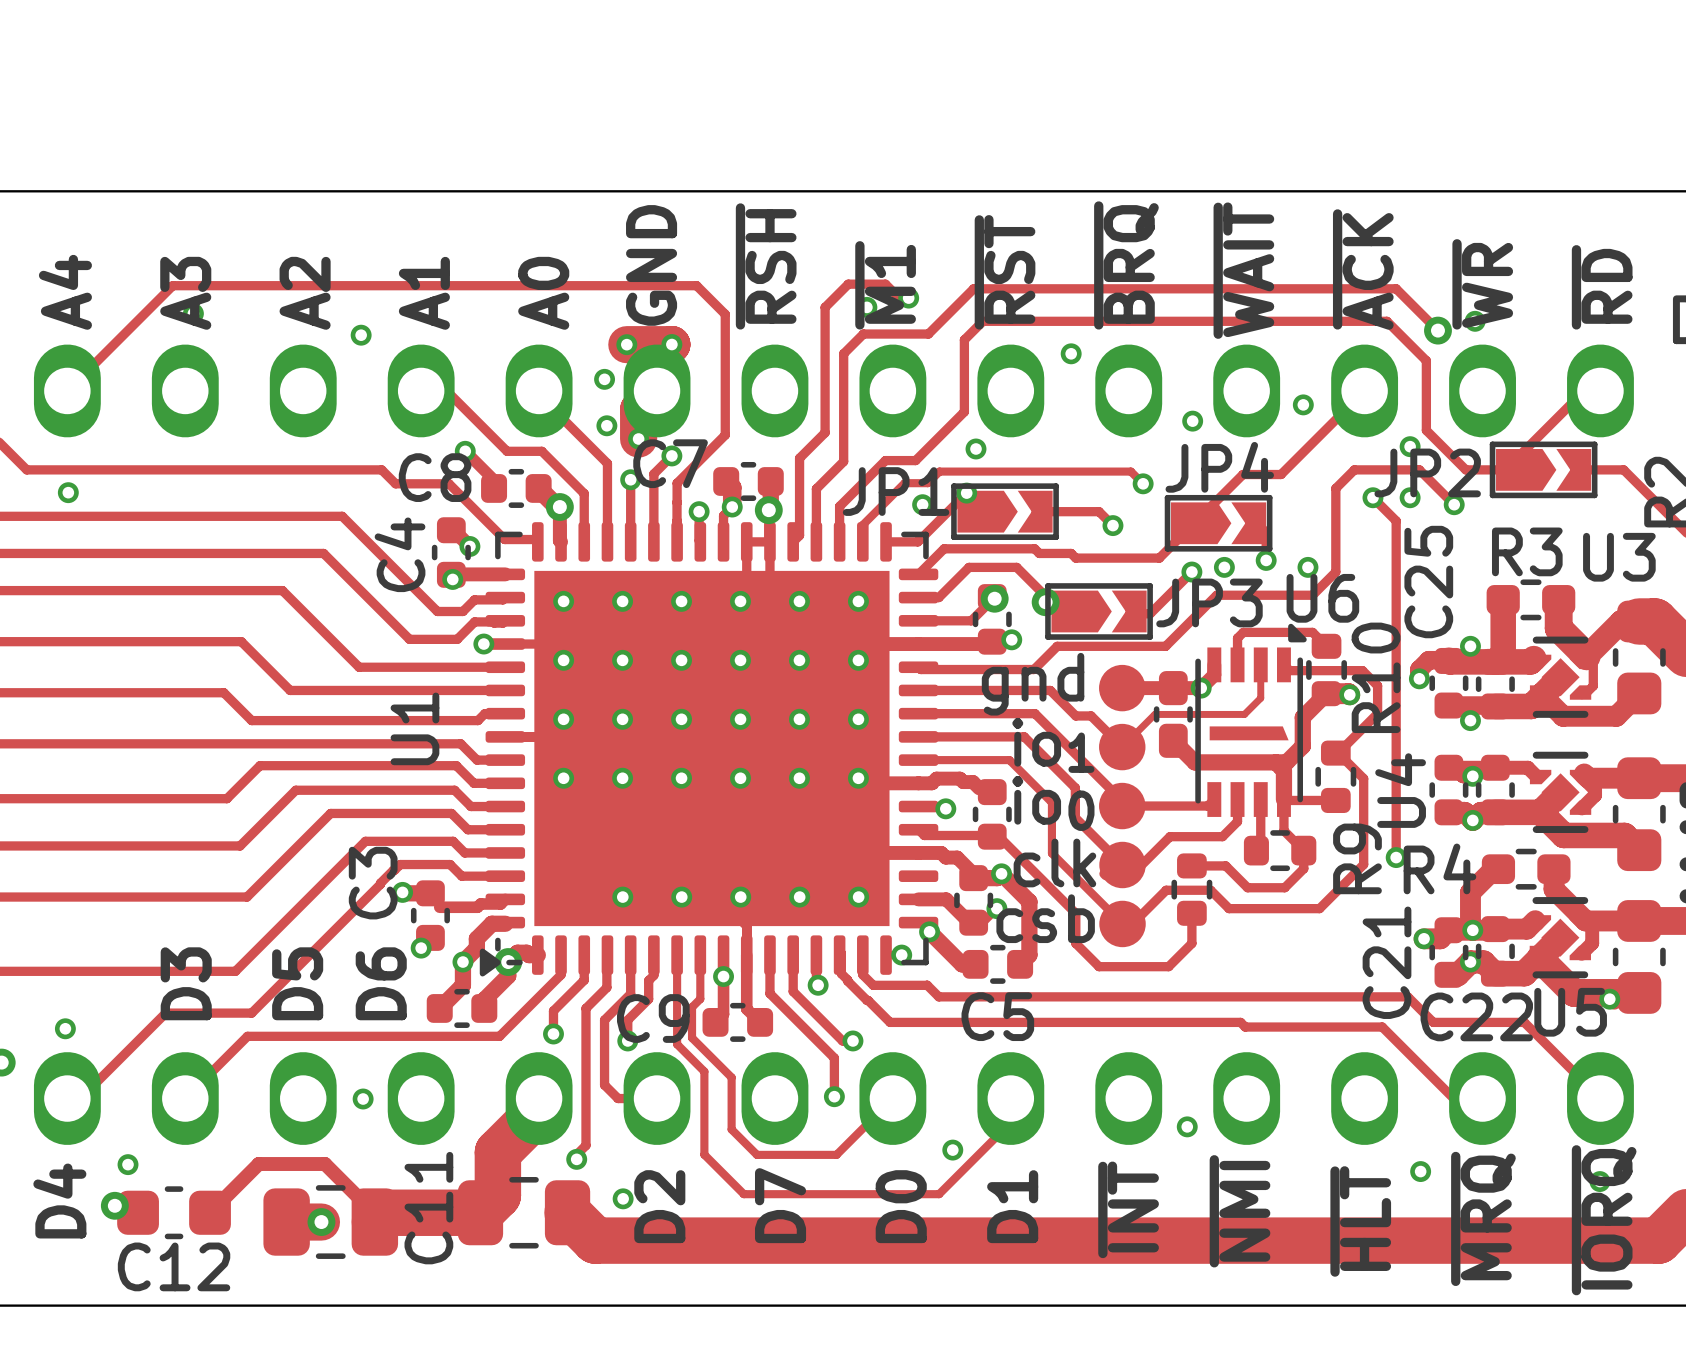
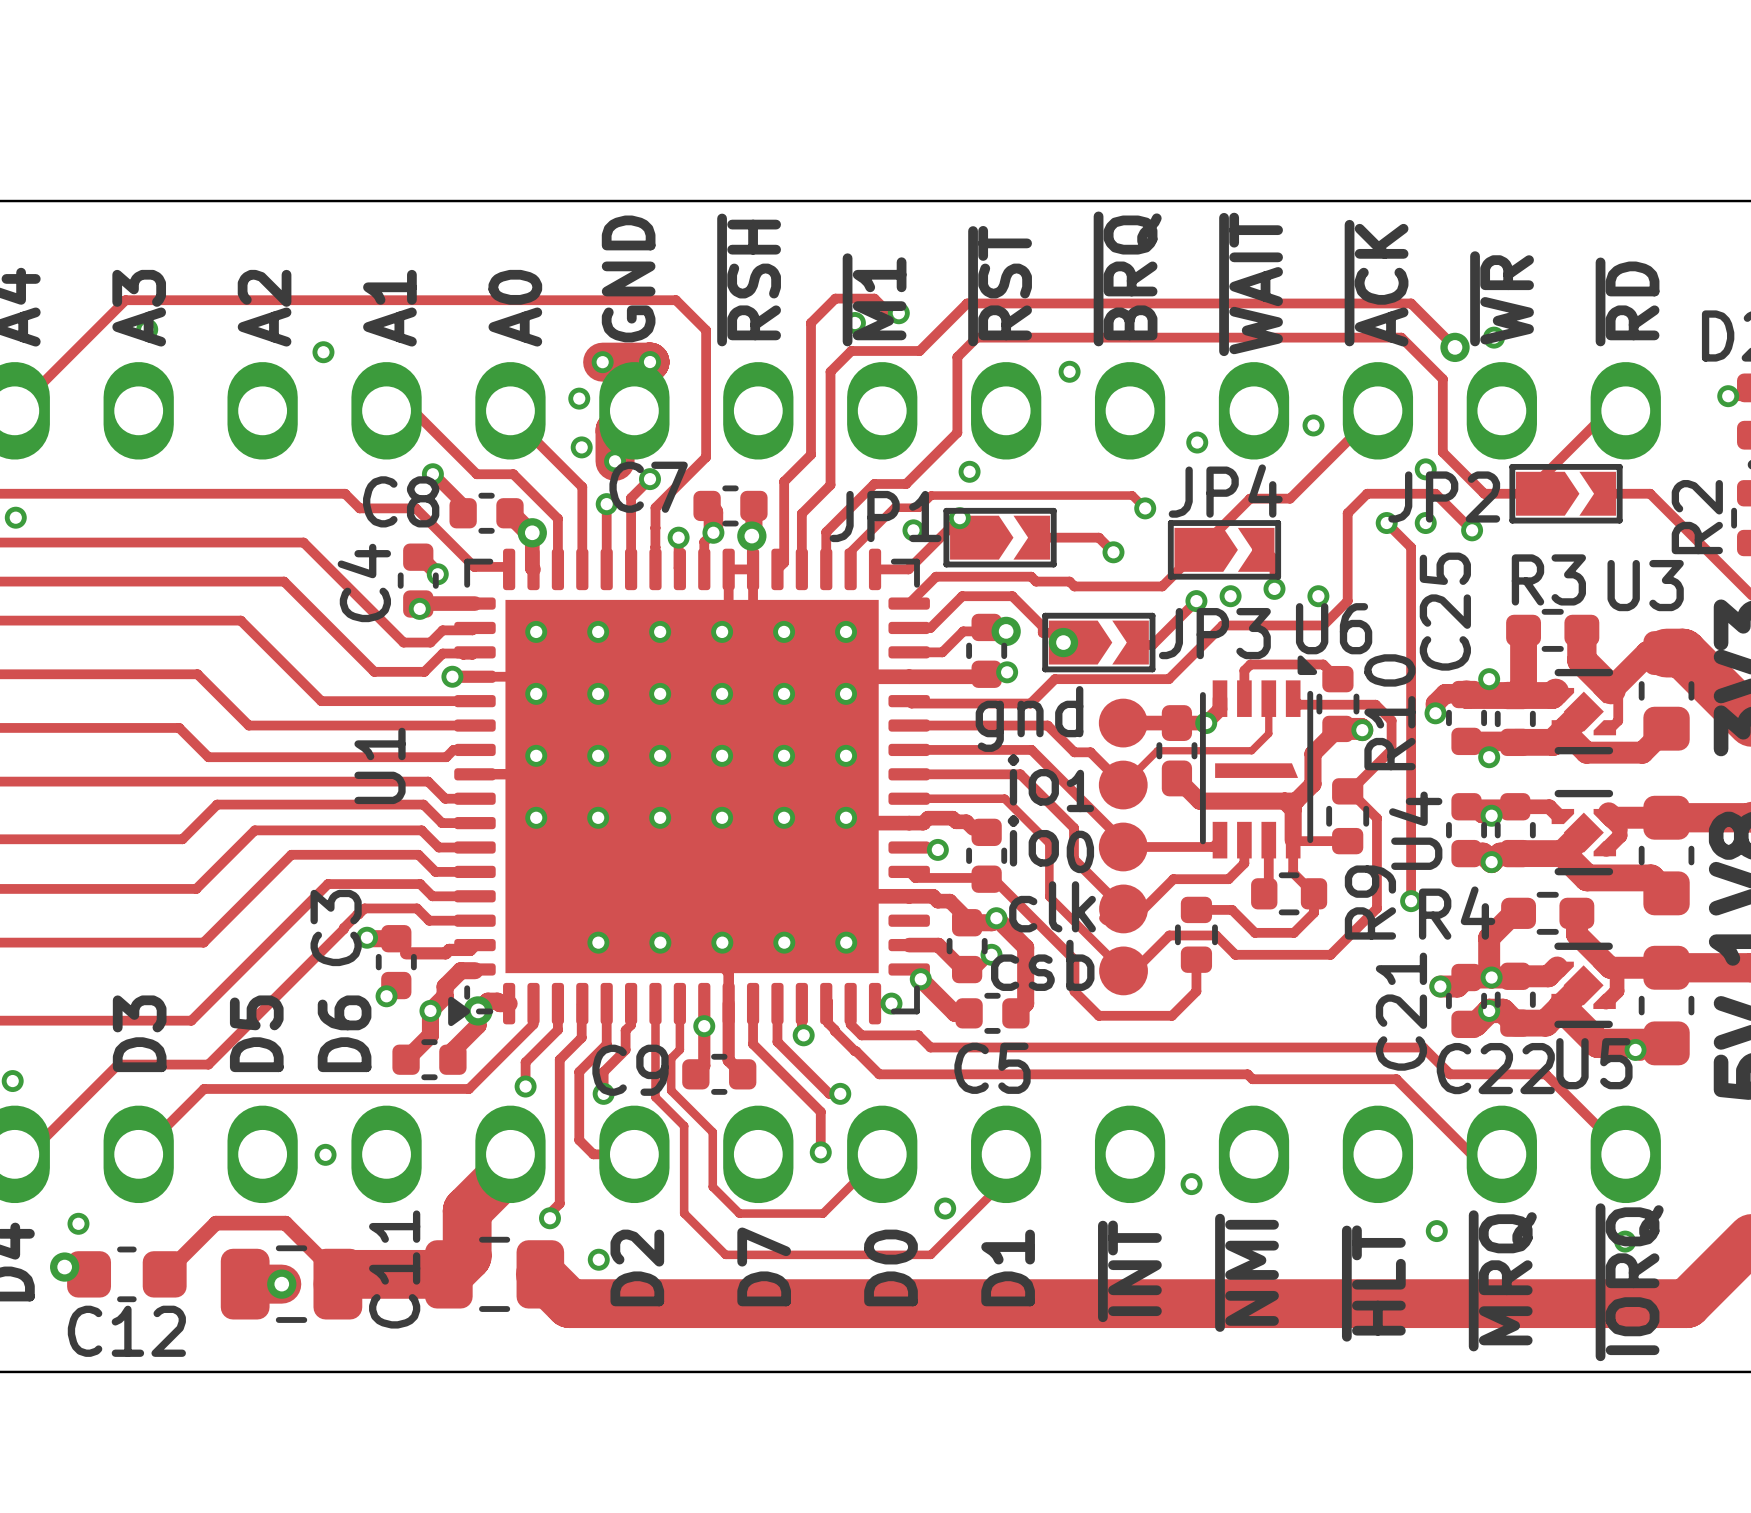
track: (994, 598) (971, 620) (950, 620) -> (1006, 631) (963, 631) (942, 652)
via position: (994, 598) -> (1006, 631)
via position: (1045, 602) -> (1063, 642)

